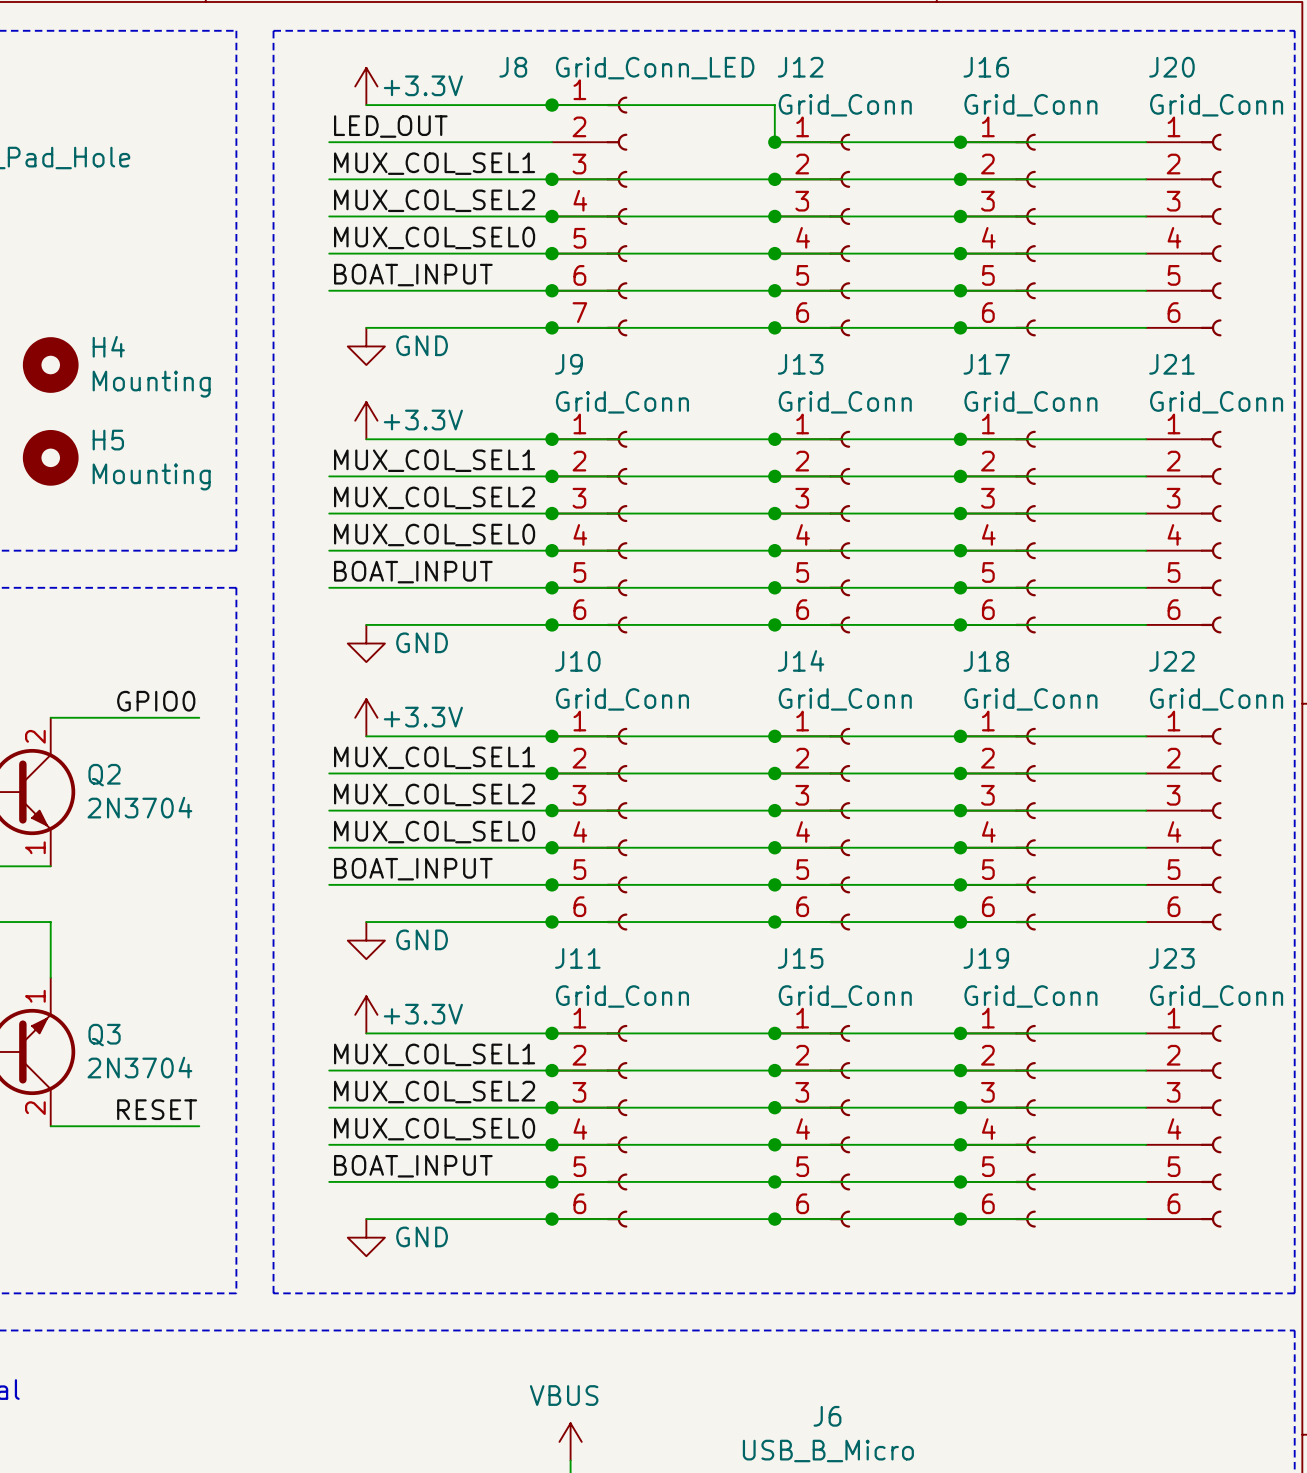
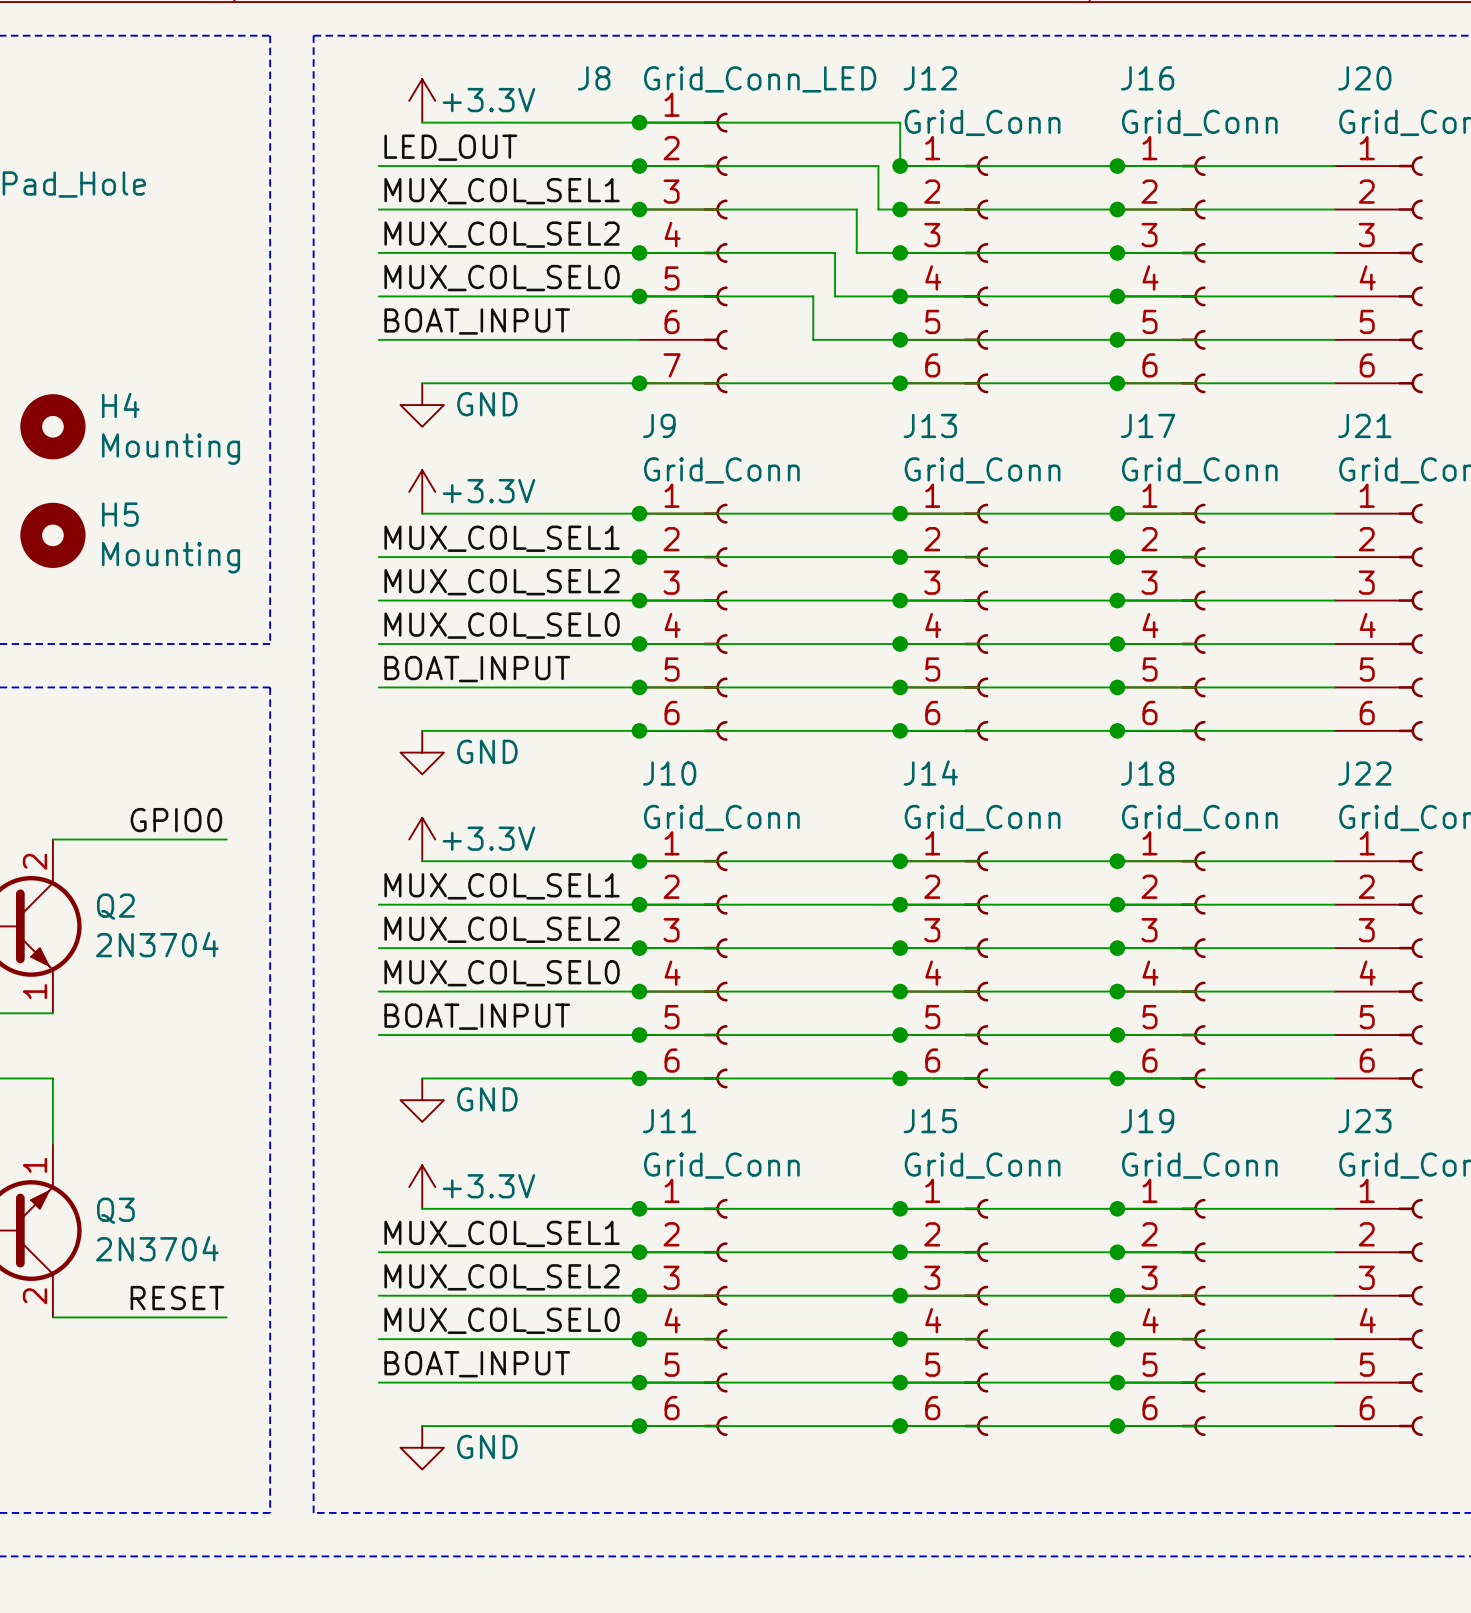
wire: none -> (639, 166) (878, 166) (878, 209)
junction: none -> (639, 166)
wire: (737, 179) (756, 179) -> (856, 209) (856, 252)
wire: (719, 216) (737, 216) -> (834, 252) (834, 296)
wire: (700, 253) (719, 253) -> (813, 296) (813, 339)
wire: (552, 290) (700, 290) -> none
junction: (552, 290) -> none

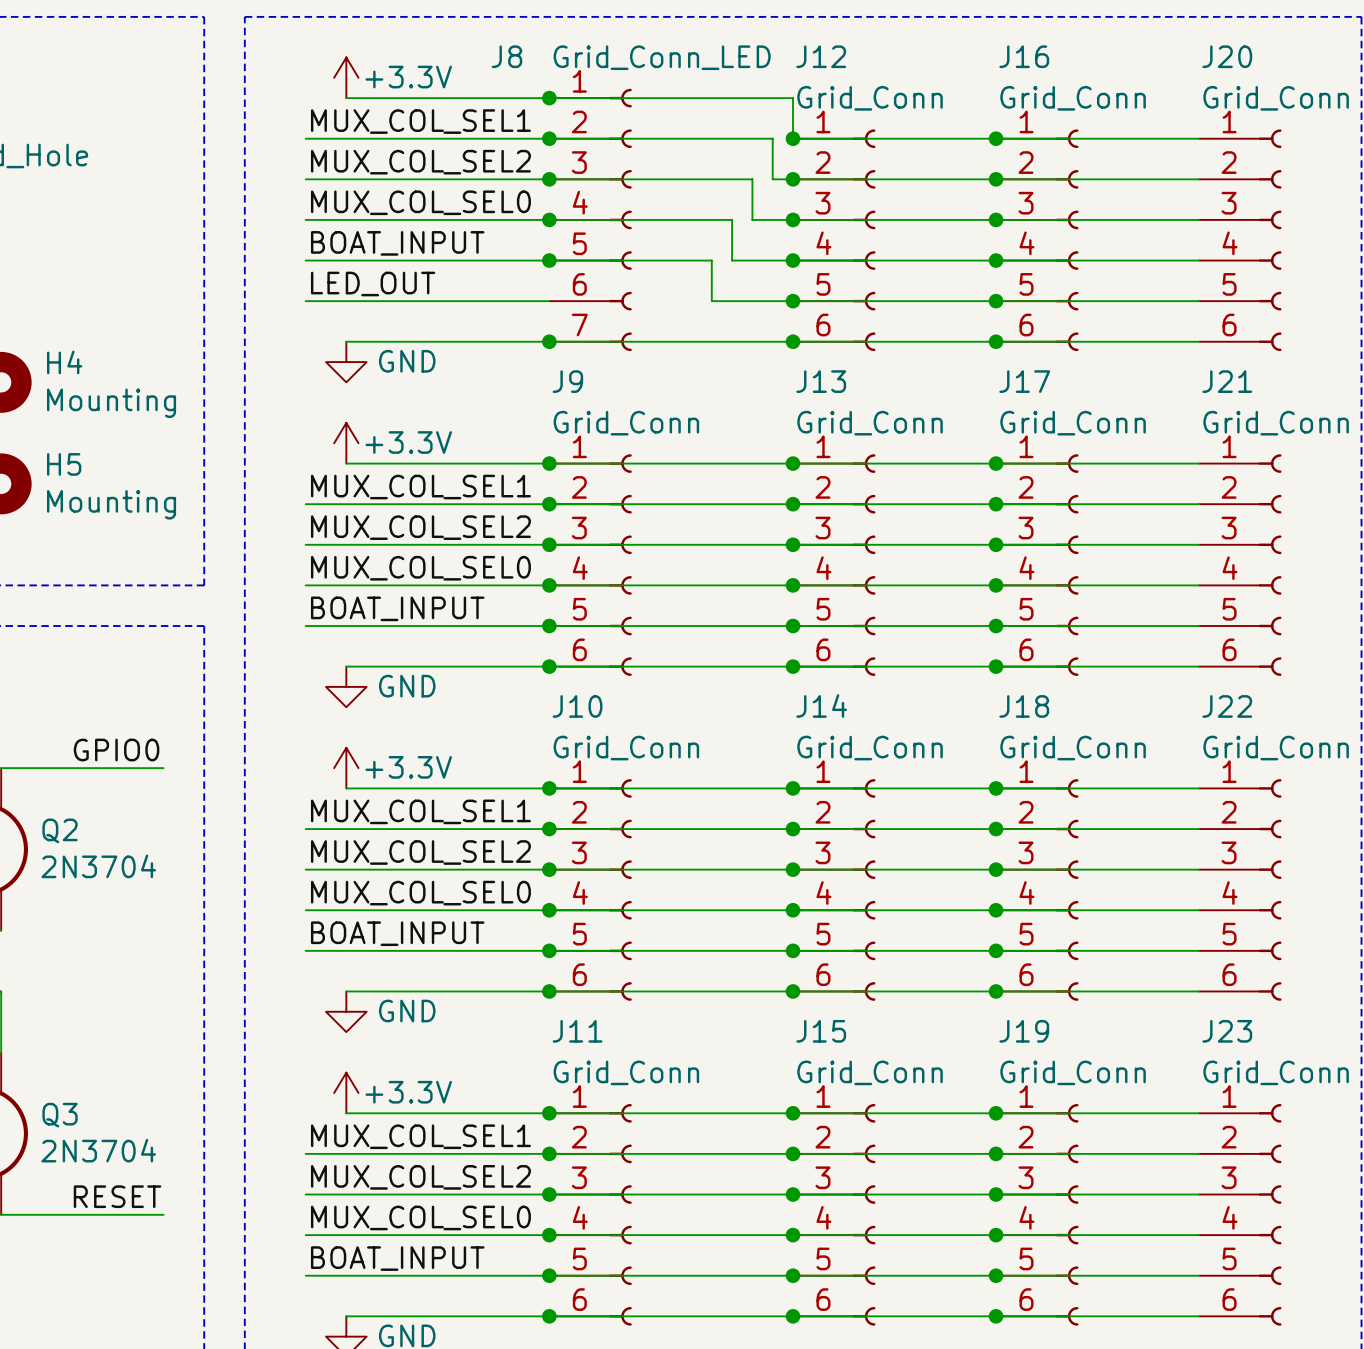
label: LED_OUT (450, 147) -> MUX_COL_SEL1 (420, 121)
label: MUX_COL_SEL1 (502, 191) -> MUX_COL_SEL2 (420, 162)
label: MUX_COL_SEL2 (502, 234) -> MUX_COL_SEL0 (420, 202)
label: MUX_COL_SEL0 (502, 278) -> BOAT_INPUT (397, 243)
label: BOAT_INPUT (477, 321) -> LED_OUT (373, 283)

